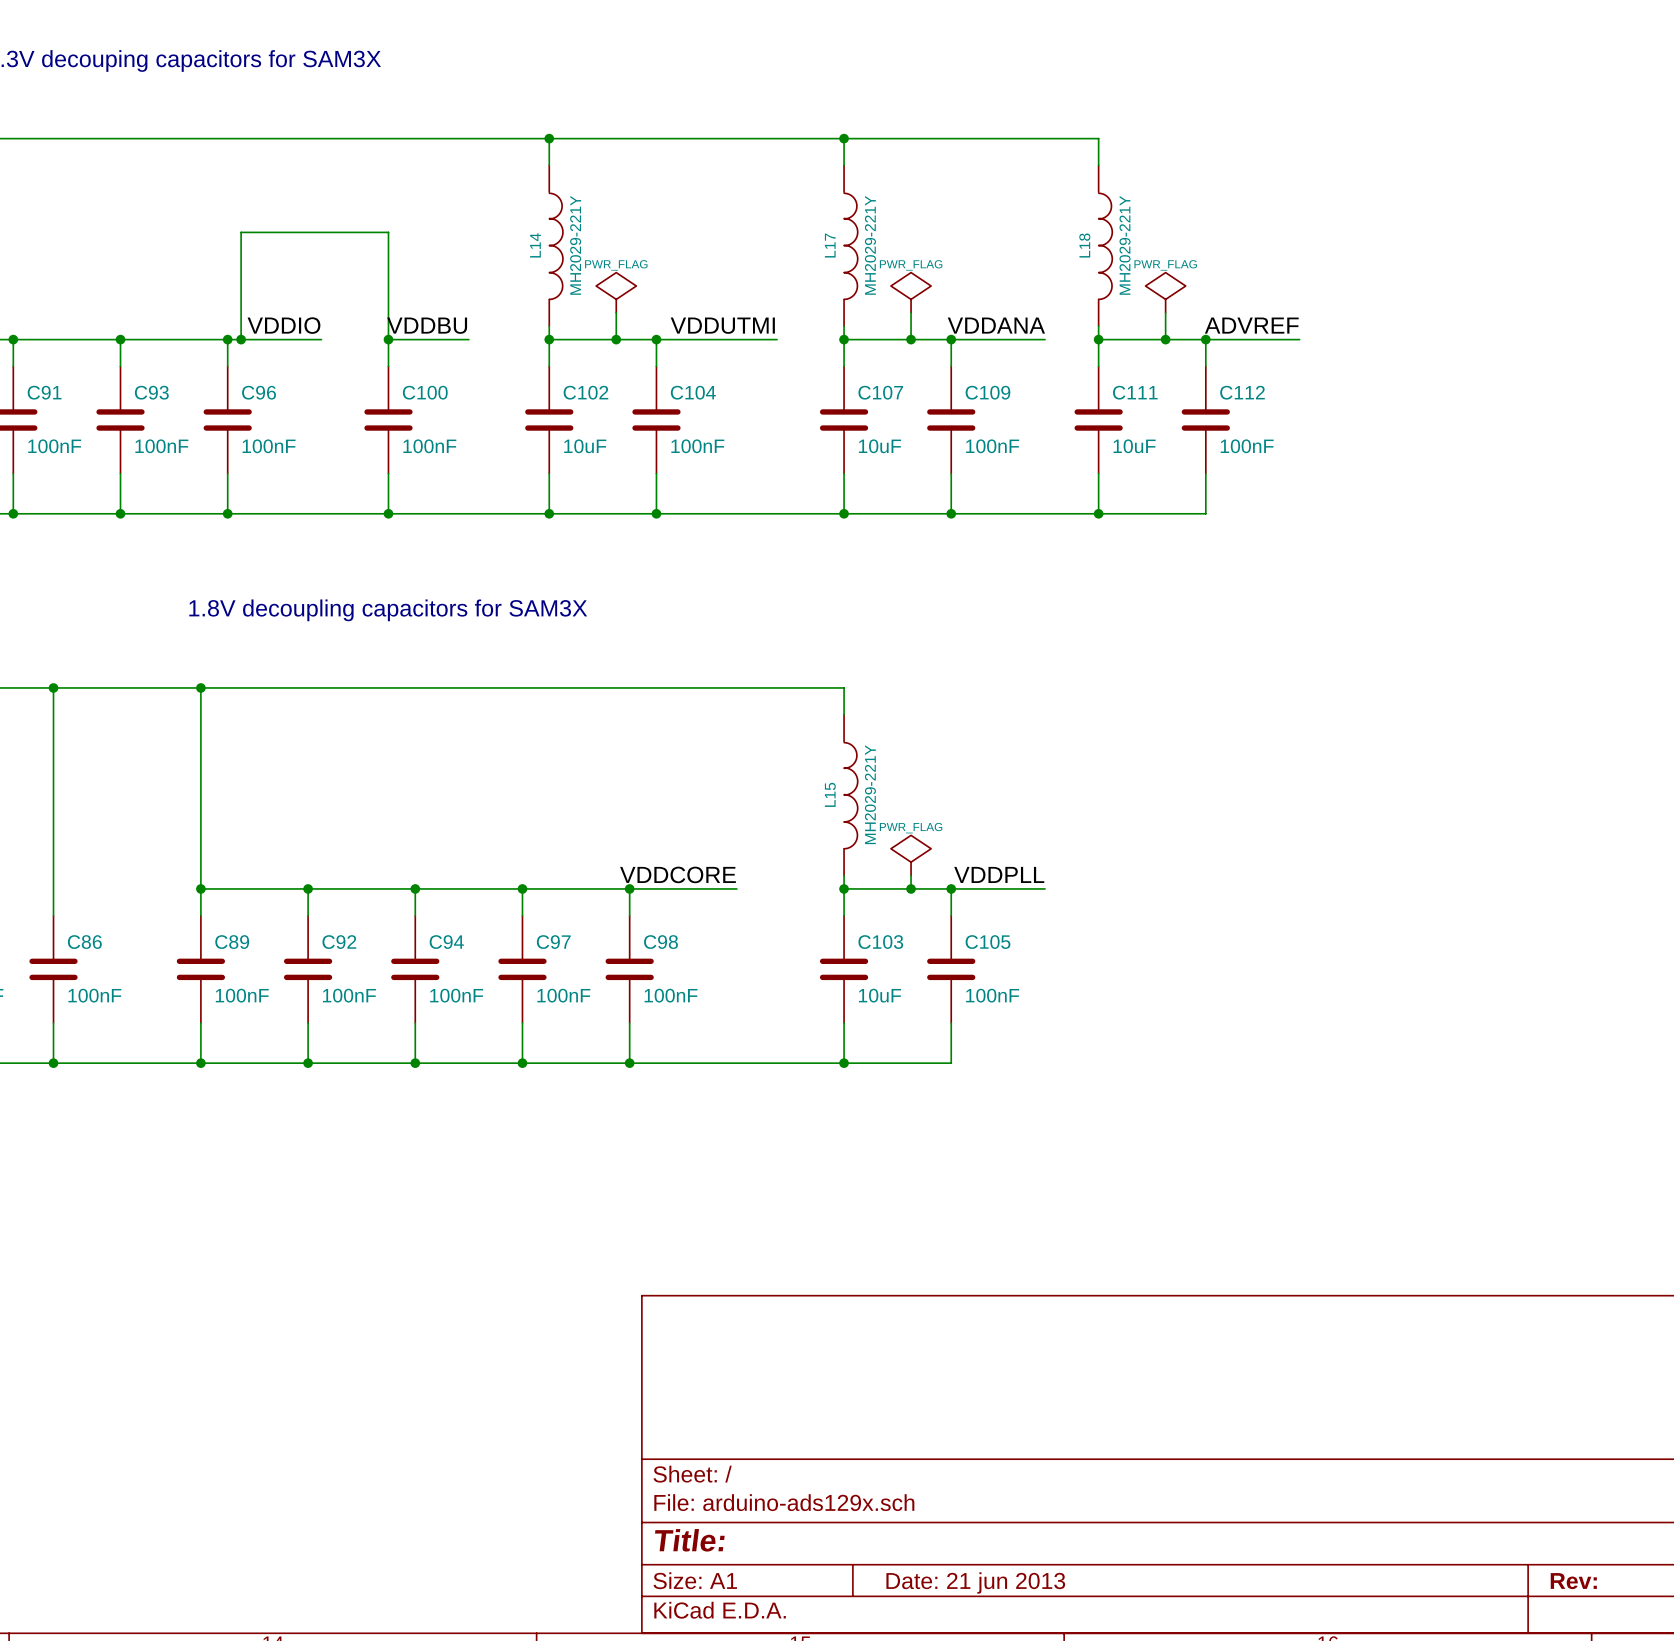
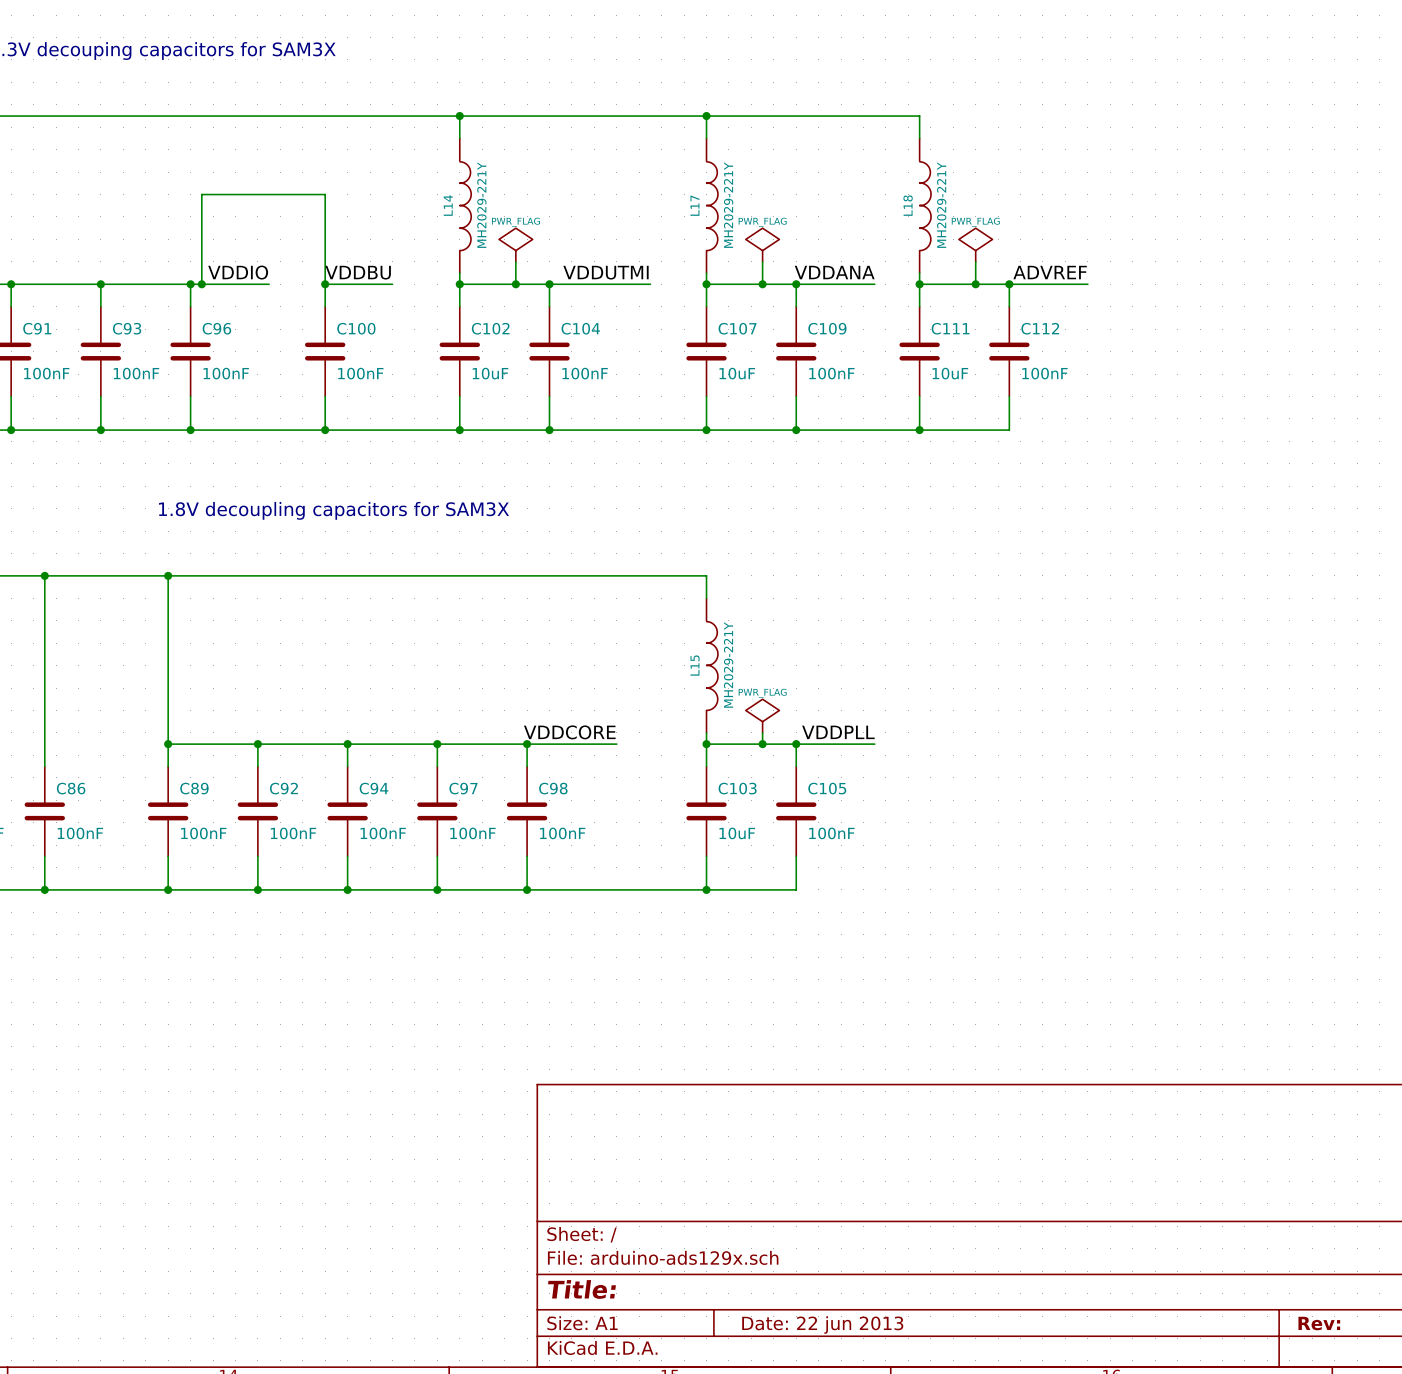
title block: Date: 21 jun 2013 (975, 1582) -> Date: 22 jun 2013 (822, 1325)

